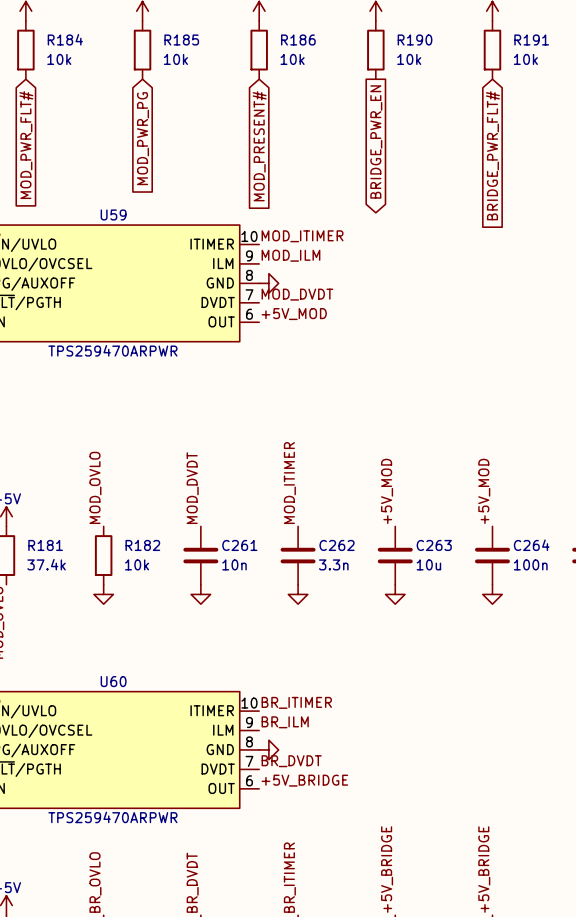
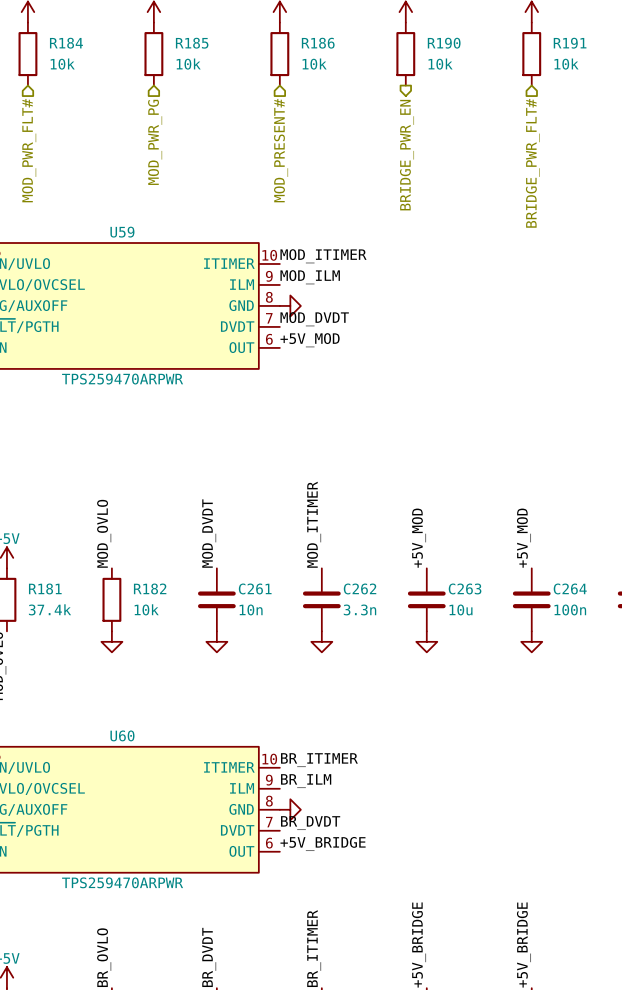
global label: MOD_PWR_PG (143, 138) -> none
hierarchical label: none -> MOD_PWR_PG (155, 142)
global label: BRIDGE_PWR_EN (376, 141) -> none
global label: MOD_PWR_FLT# (26, 145) -> none
hierarchical label: none -> MOD_PWR_FLT# (29, 150)
global label: MOD_PRESENT# (259, 146) -> none
hierarchical label: none -> MOD_PRESENT# (281, 150)
hierarchical label: none -> BRIDGE_PWR_EN (407, 155)
global label: BRIDGE_PWR_FLT# (492, 155) -> none
hierarchical label: none -> BRIDGE_PWR_FLT# (532, 163)

